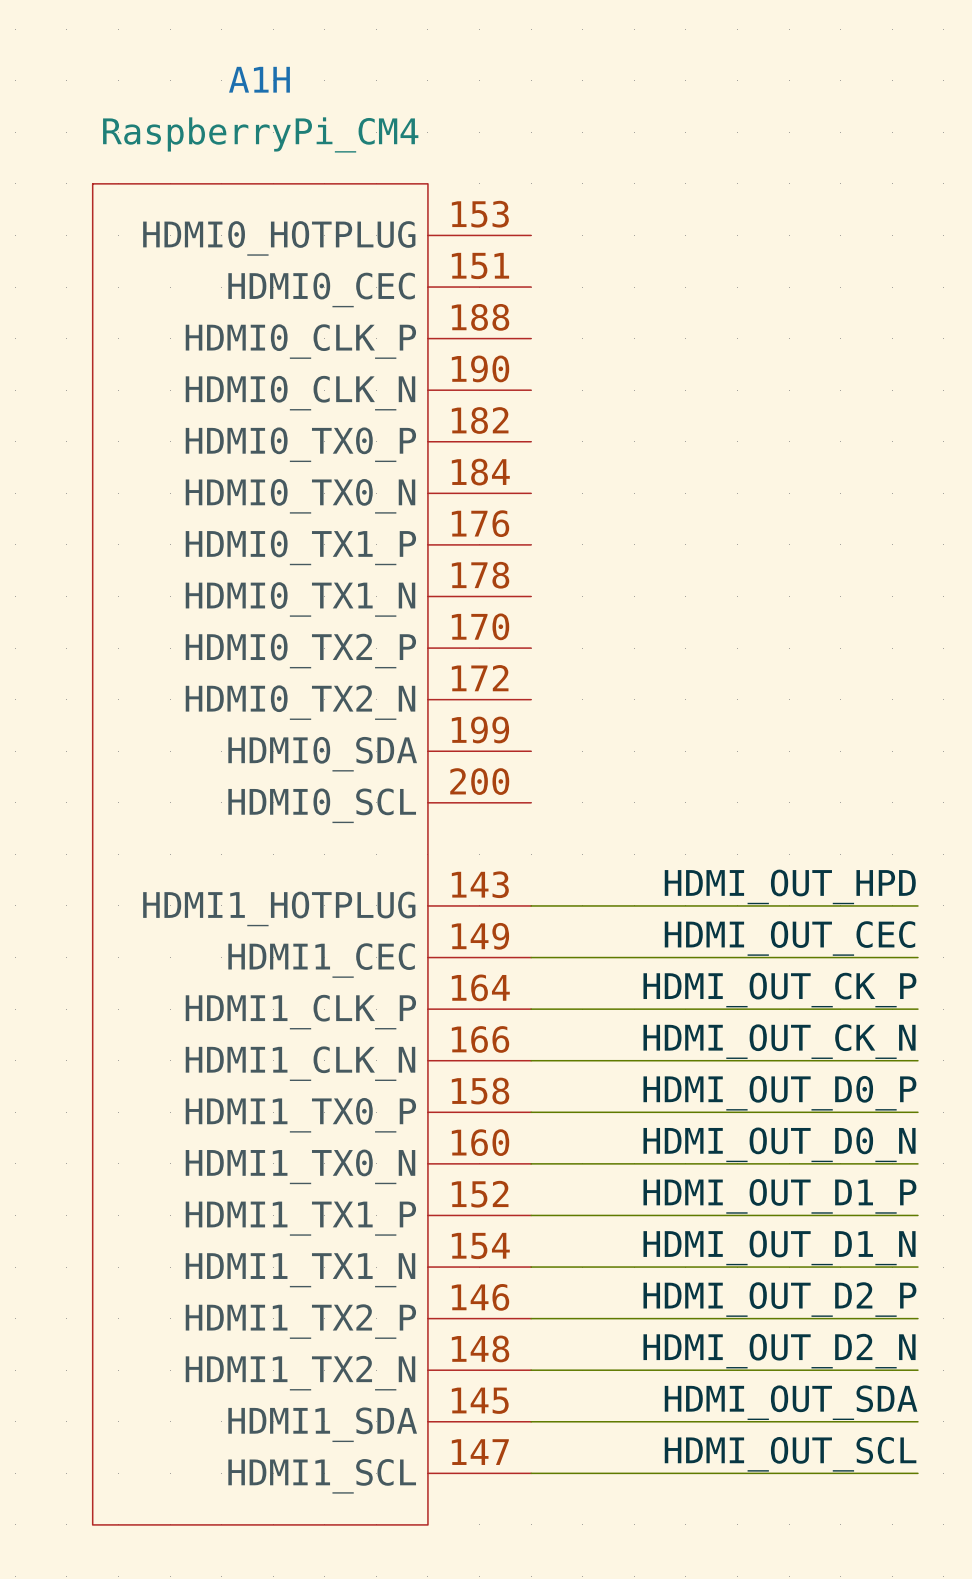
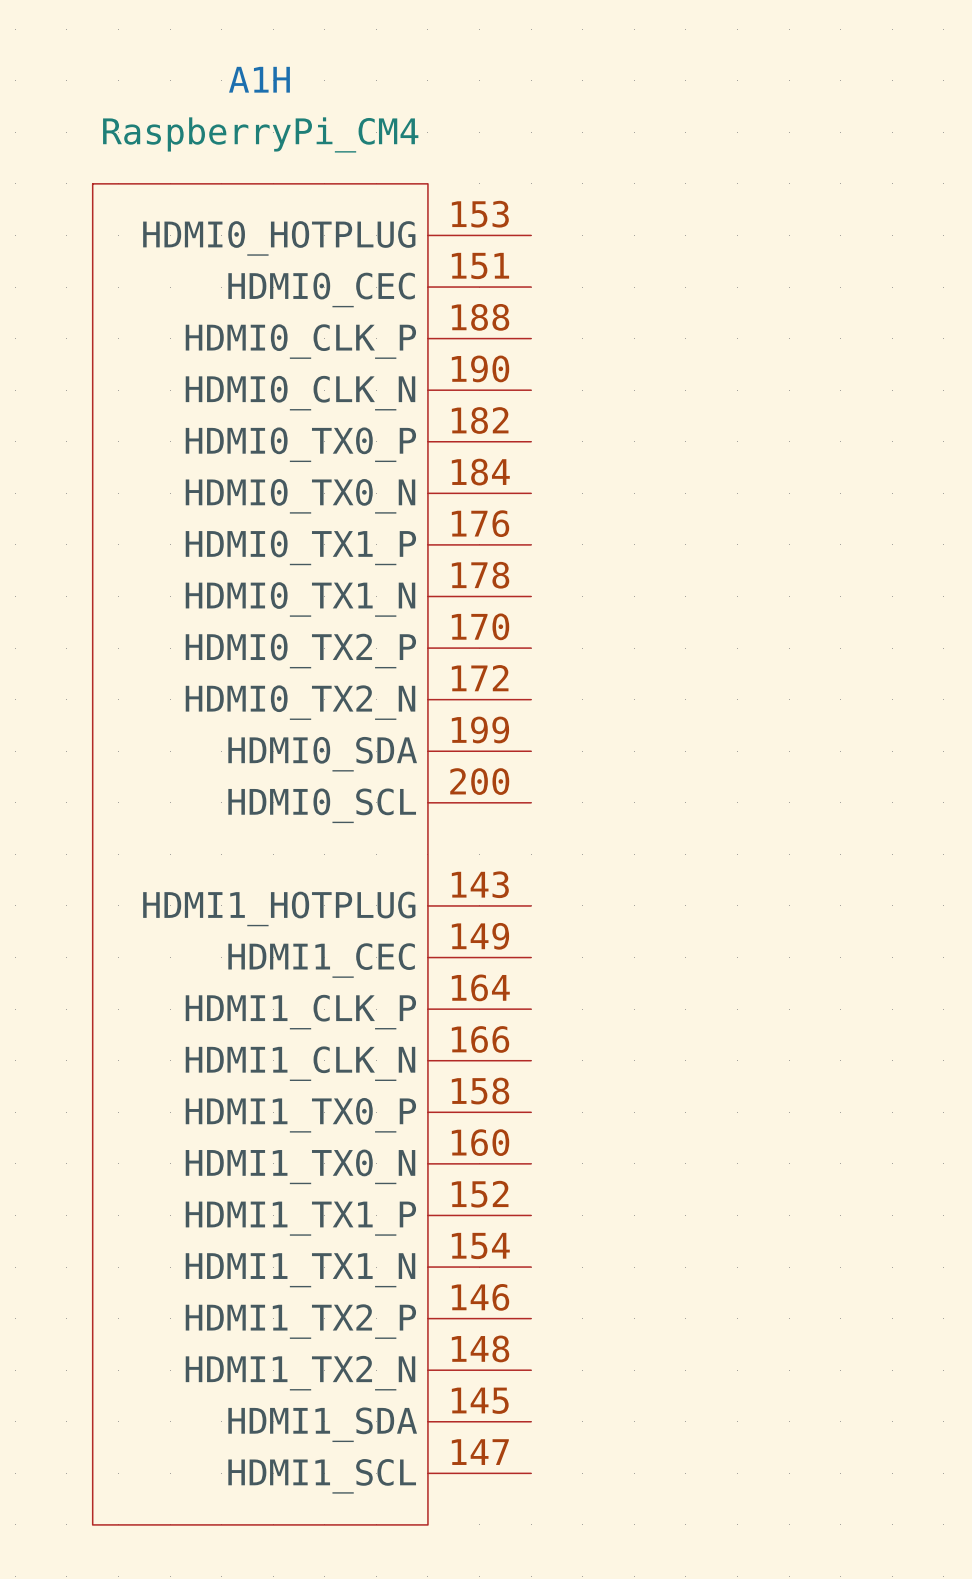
label: HDMI_OUT_HPD (790, 886) -> none
wire: (531, 905) (917, 905) -> none
label: HDMI_OUT_CEC (789, 938) -> none
wire: (531, 957) (917, 957) -> none
label: HDMI_OUT_CK_P (779, 990) -> none
wire: (531, 1009) (917, 1009) -> none
label: HDMI_OUT_CK_N (779, 1041) -> none
wire: (531, 1060) (917, 1060) -> none
label: HDMI_OUT_D0_P (779, 1093) -> none
wire: (531, 1112) (917, 1112) -> none
label: HDMI_OUT_D0_N (779, 1144) -> none
wire: (531, 1163) (917, 1163) -> none
label: HDMI_OUT_D1_P (779, 1196) -> none
wire: (531, 1215) (917, 1215) -> none
label: HDMI_OUT_D1_N (779, 1247) -> none
wire: (531, 1267) (917, 1267) -> none
label: HDMI_OUT_D2_P (779, 1299) -> none
wire: (531, 1318) (917, 1318) -> none
label: HDMI_OUT_D2_N (779, 1351) -> none
wire: (531, 1370) (917, 1370) -> none
label: HDMI_OUT_SDA (791, 1402) -> none
wire: (531, 1421) (917, 1421) -> none
label: HDMI_OUT_SCL (790, 1454) -> none
wire: (531, 1473) (917, 1473) -> none

